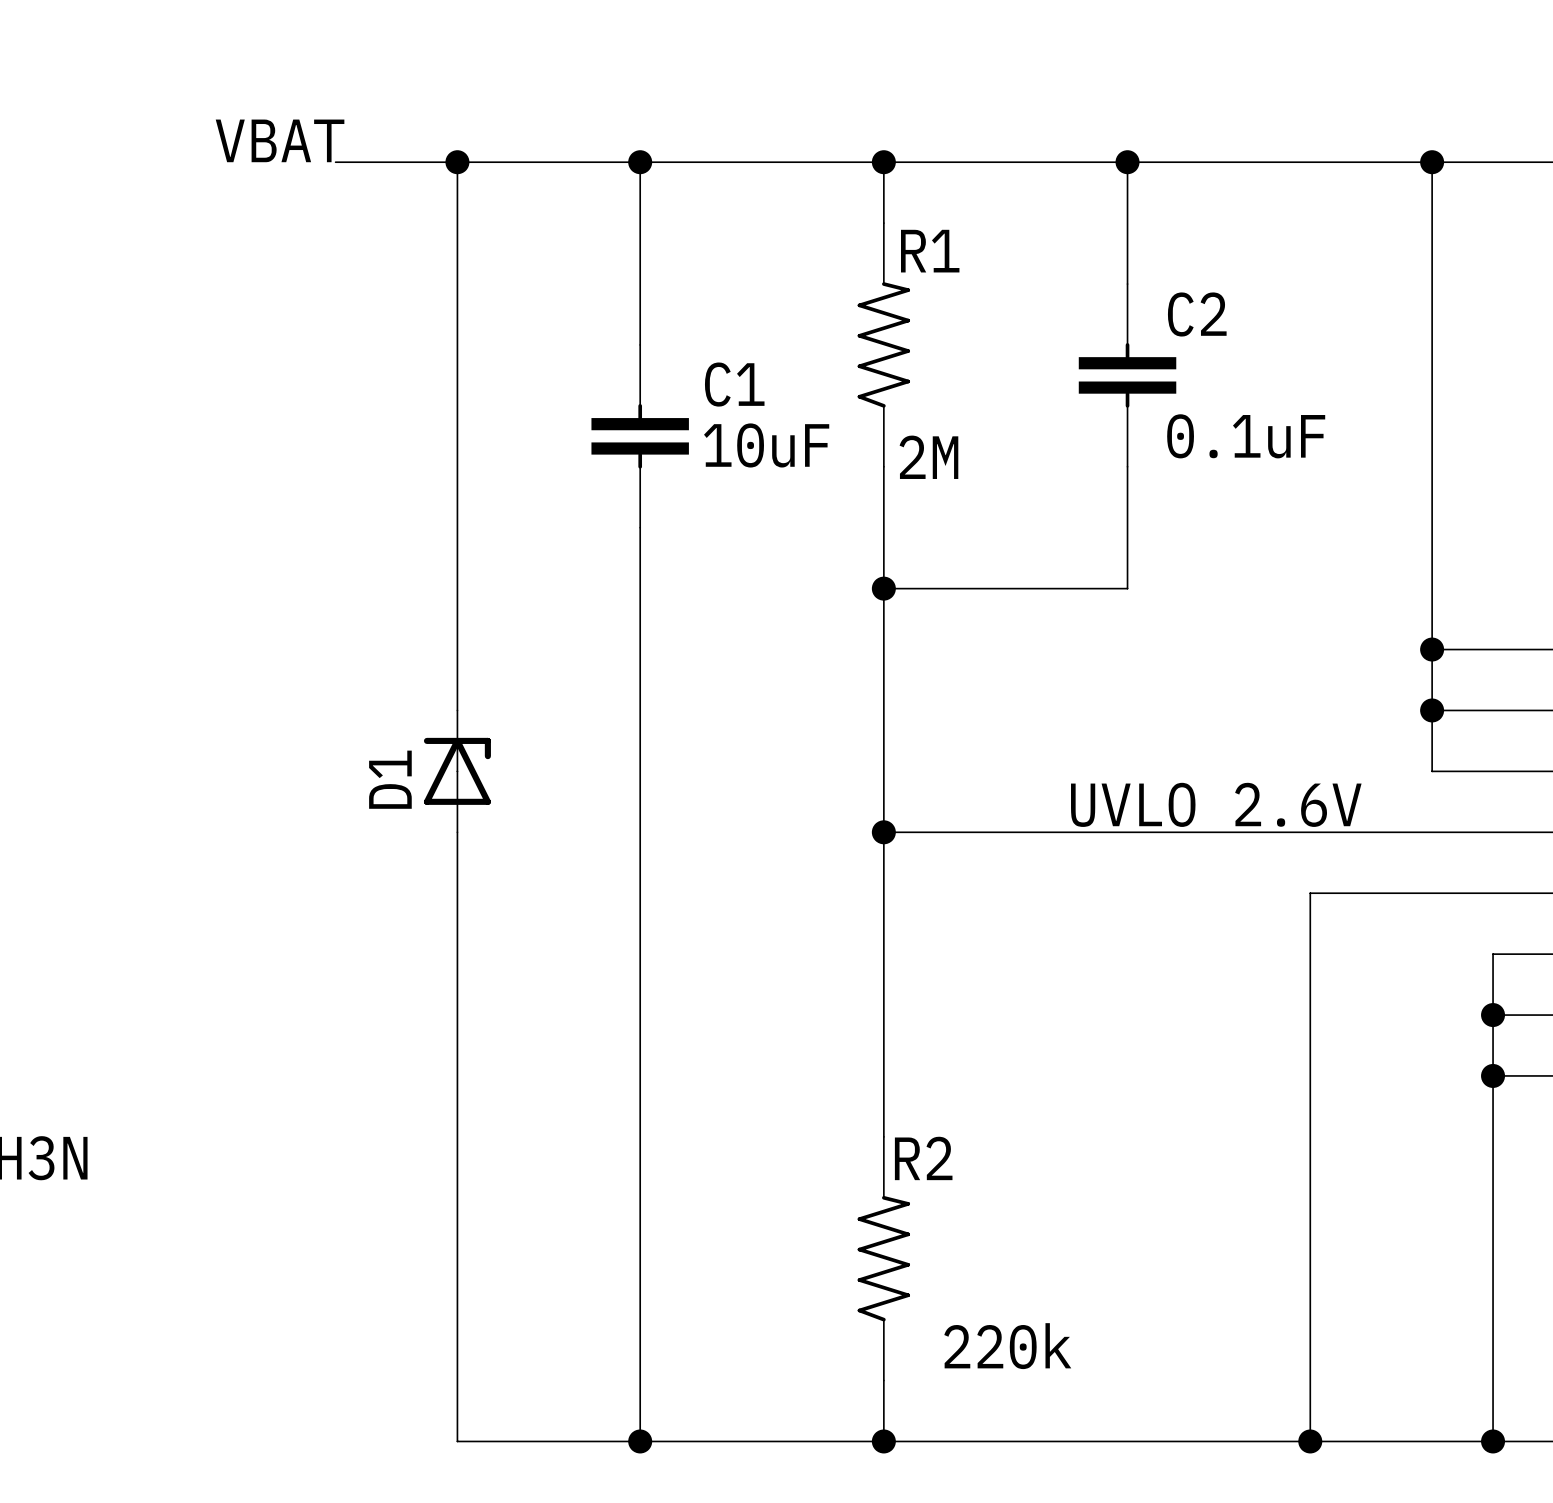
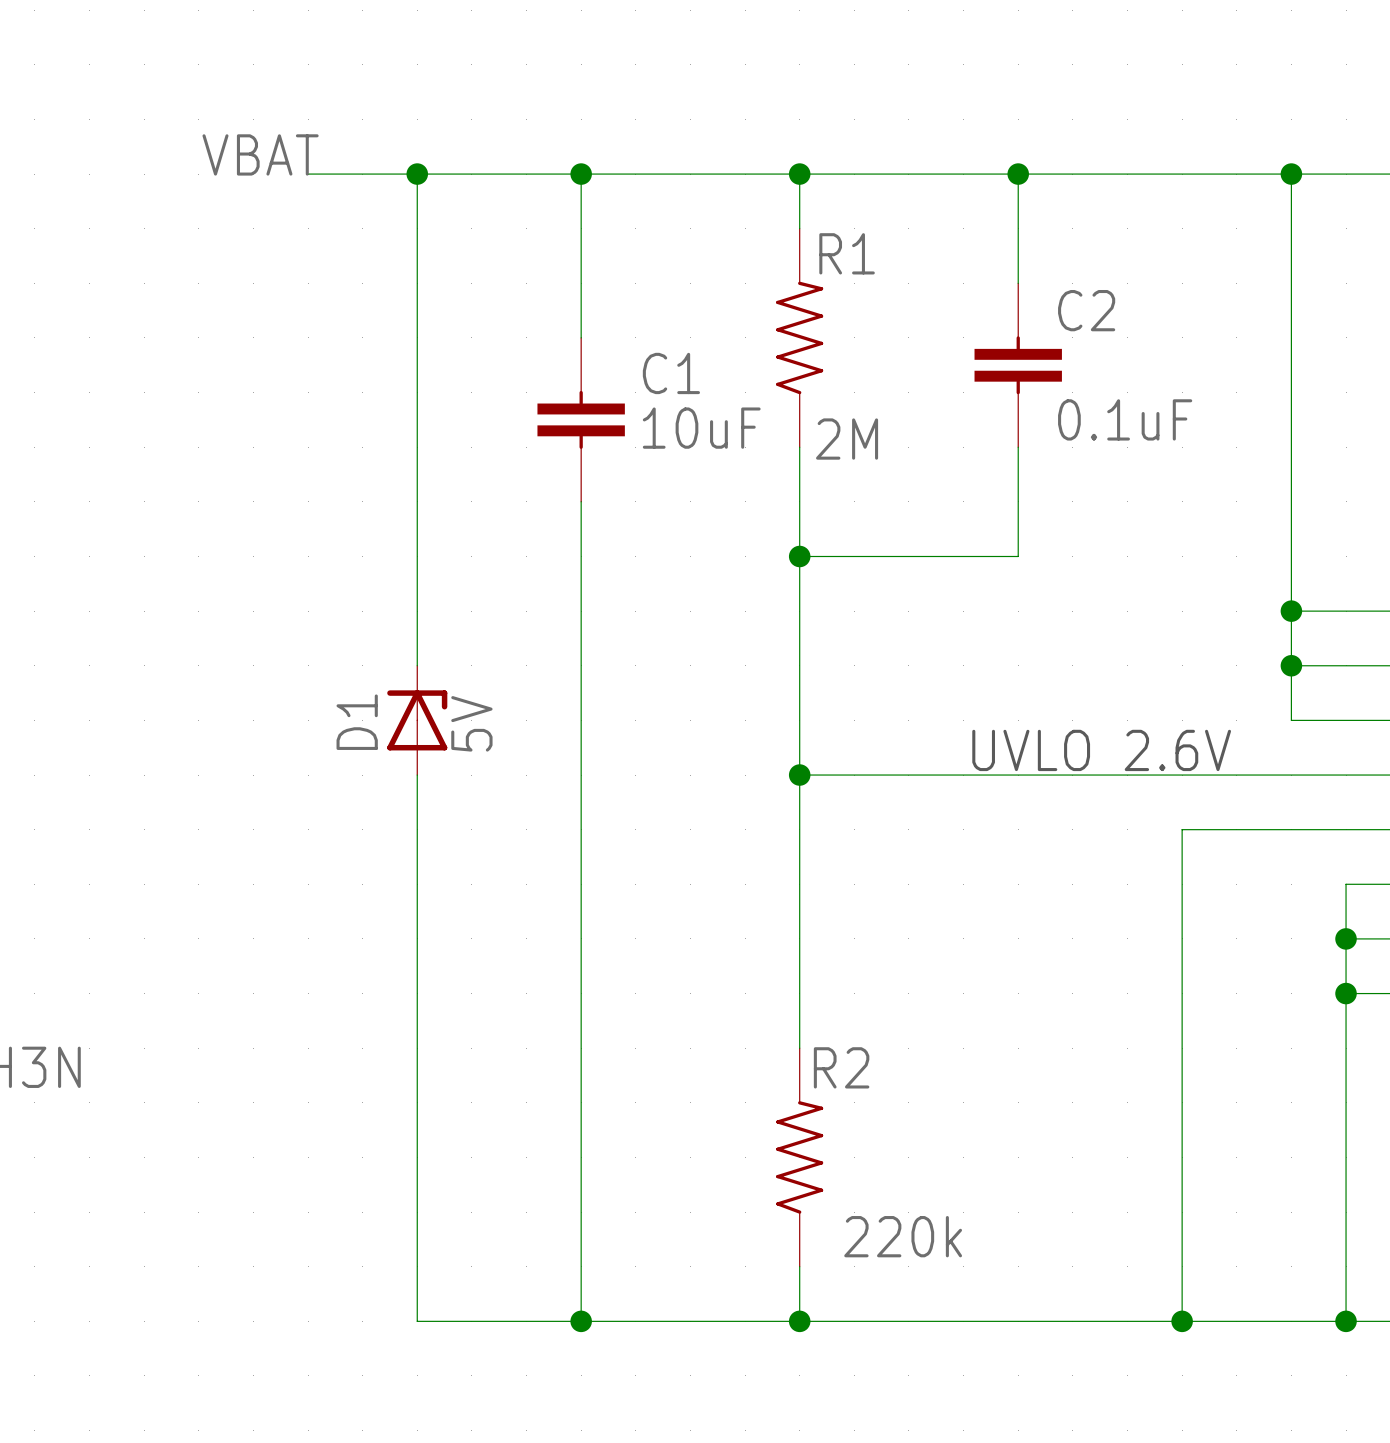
D1 value: none -> 5V (471, 723)

